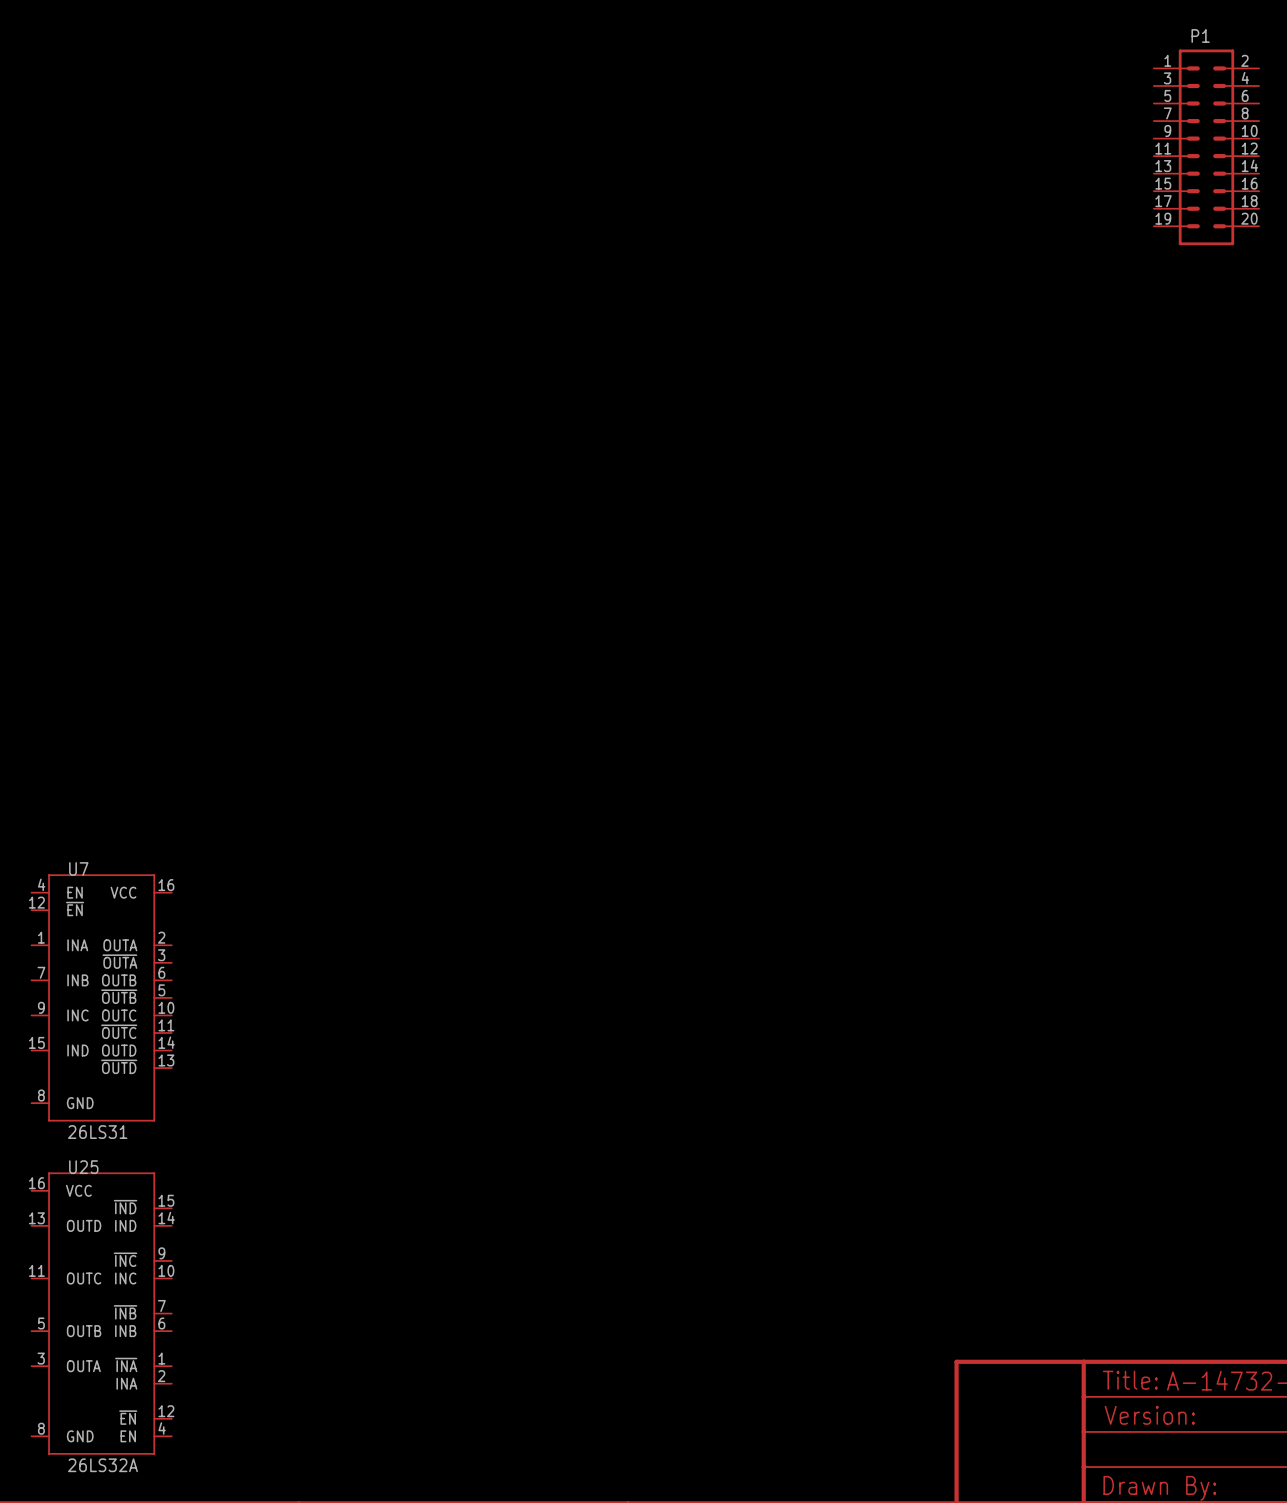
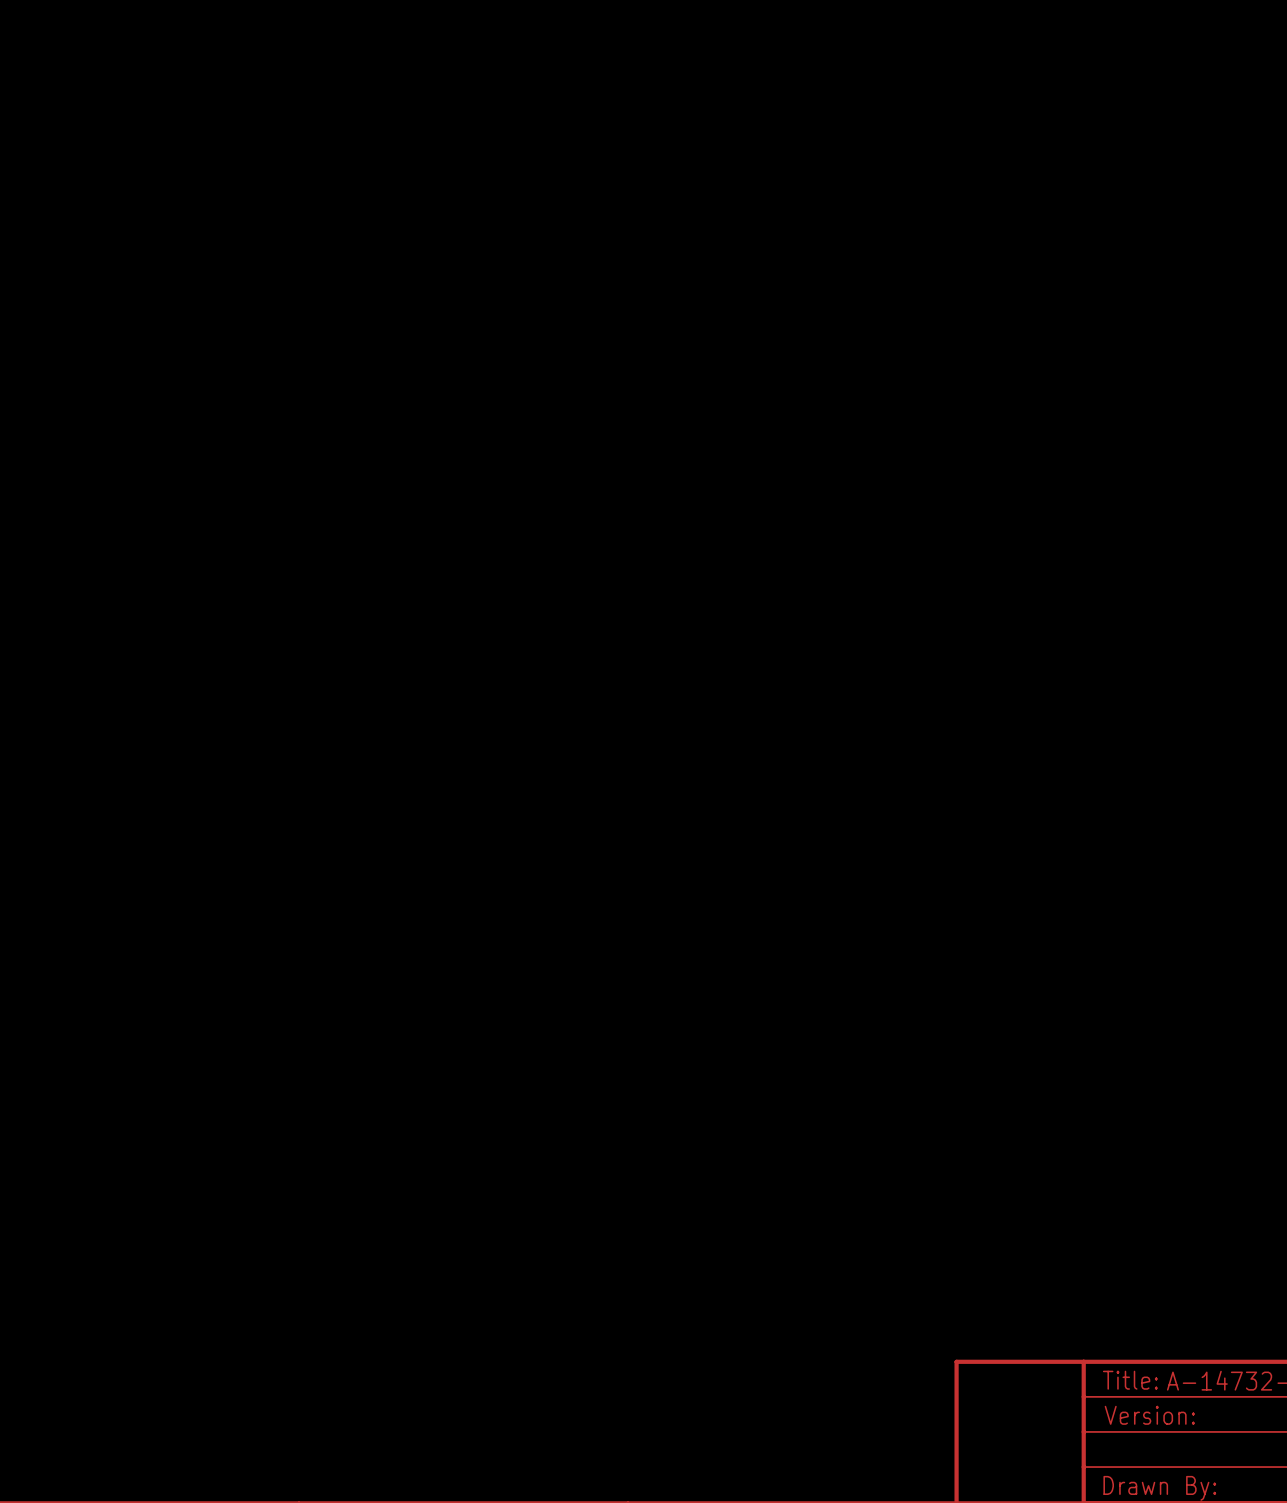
P1: (1206, 147) -> none
U7: 26LS31 (101, 997) -> none
U25: 26LS32A (101, 1313) -> none

